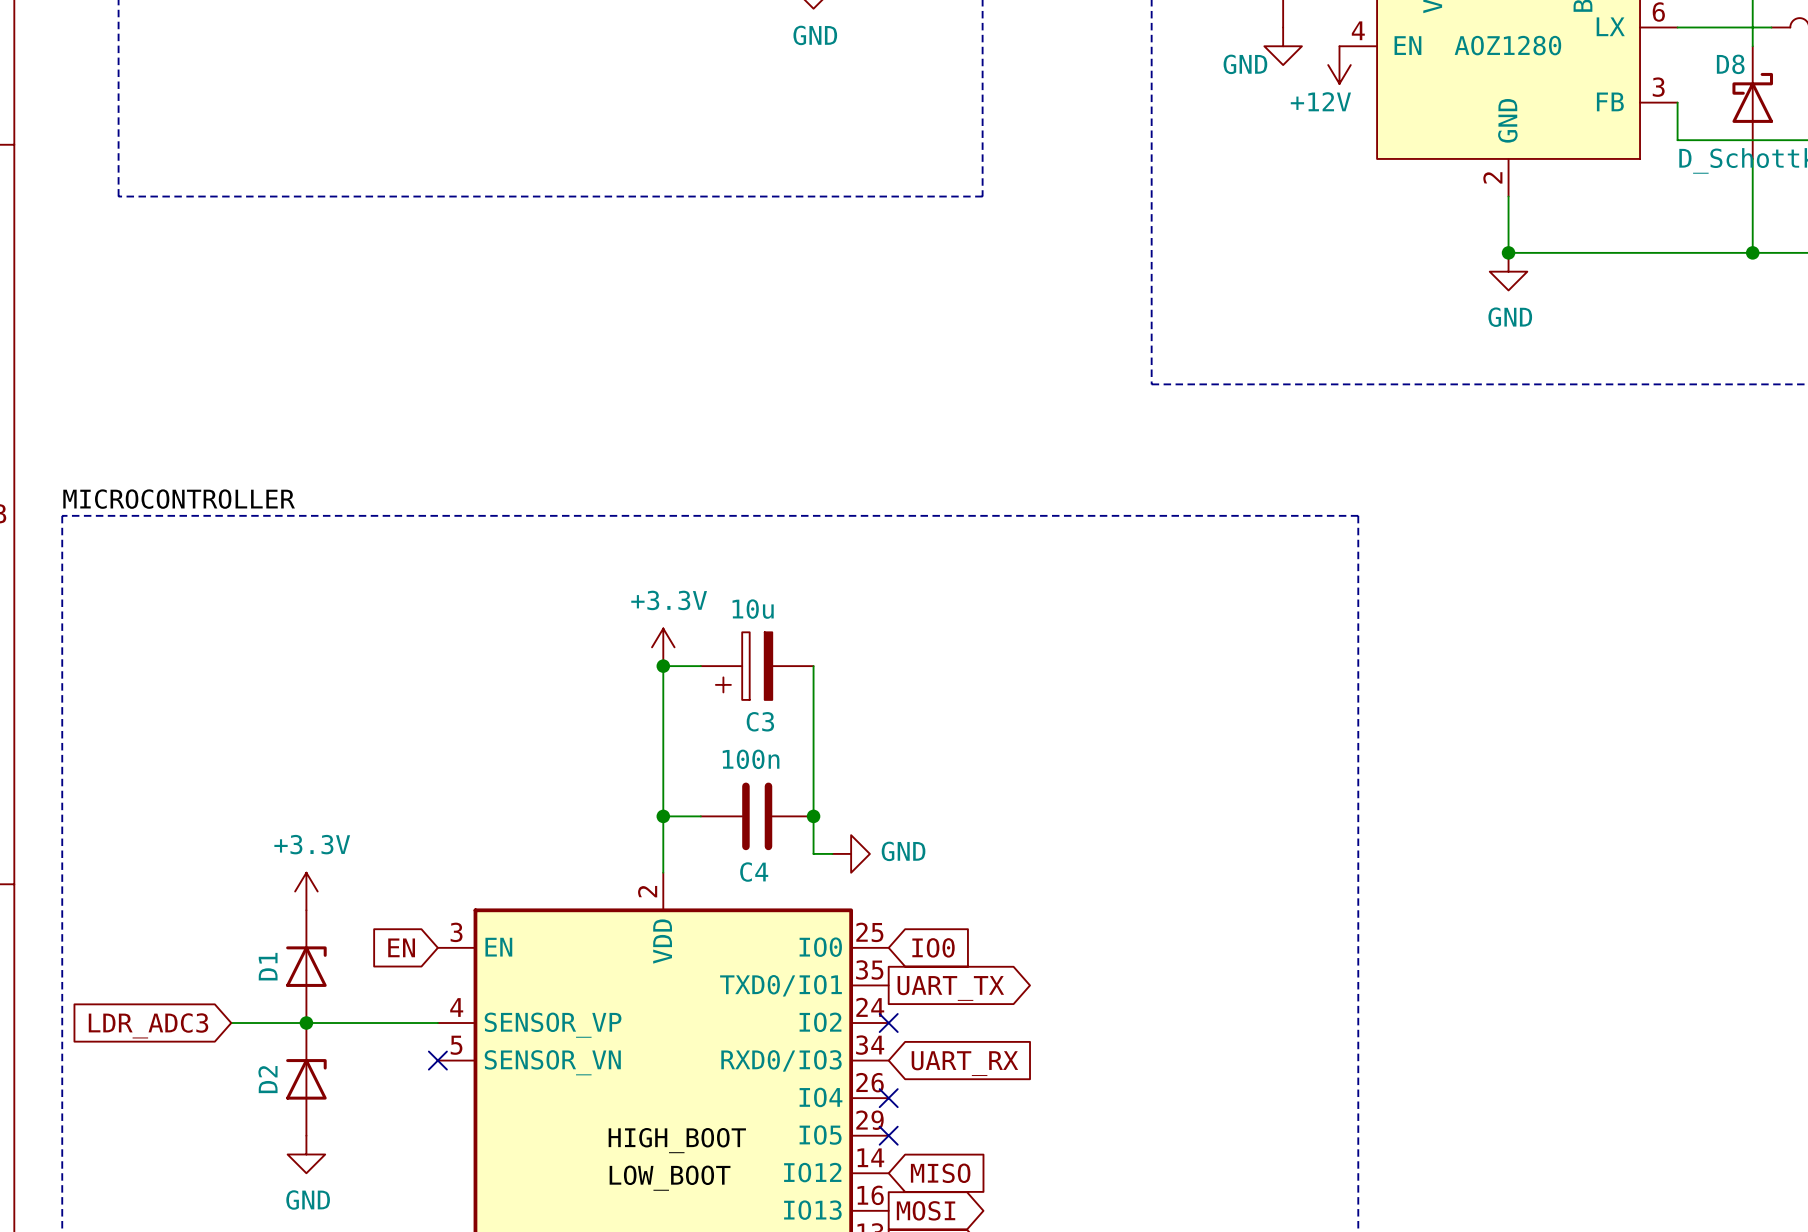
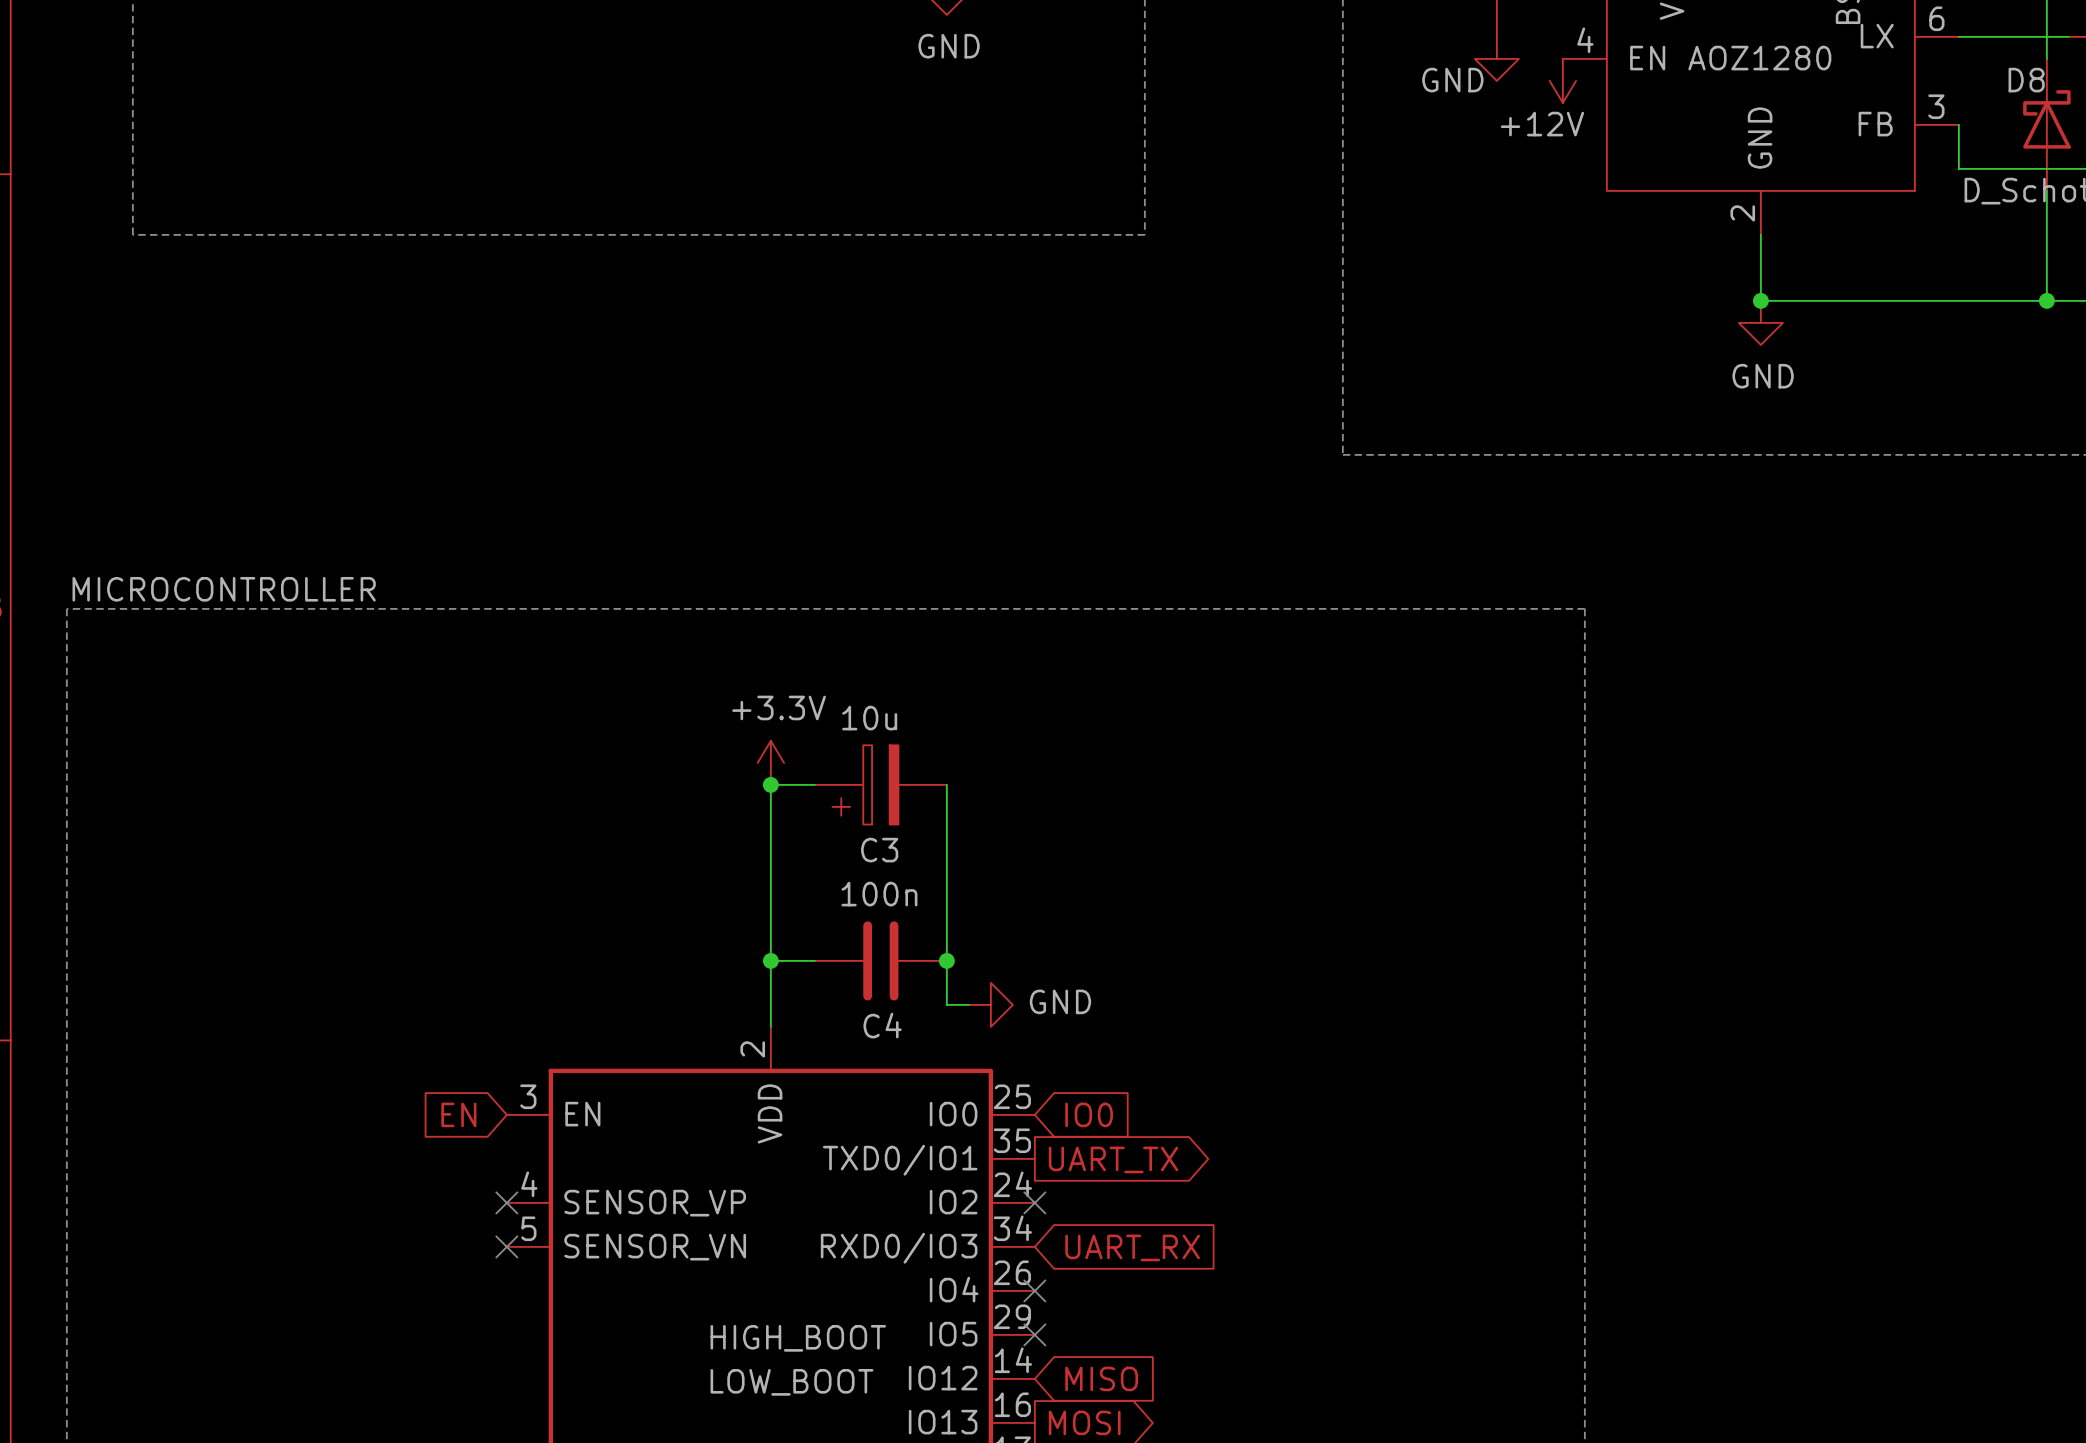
power symbol: +3.3V (306, 891) -> none
D1: (306, 966) -> none
wire: (231, 1023) (437, 1023) -> none
junction: (306, 1023) -> none
no-connect mark: none -> (506, 1202)
global label: LDR_ADC3 (148, 1025) -> none
D2: (306, 1079) -> none
power symbol: GND (306, 1154) -> none

